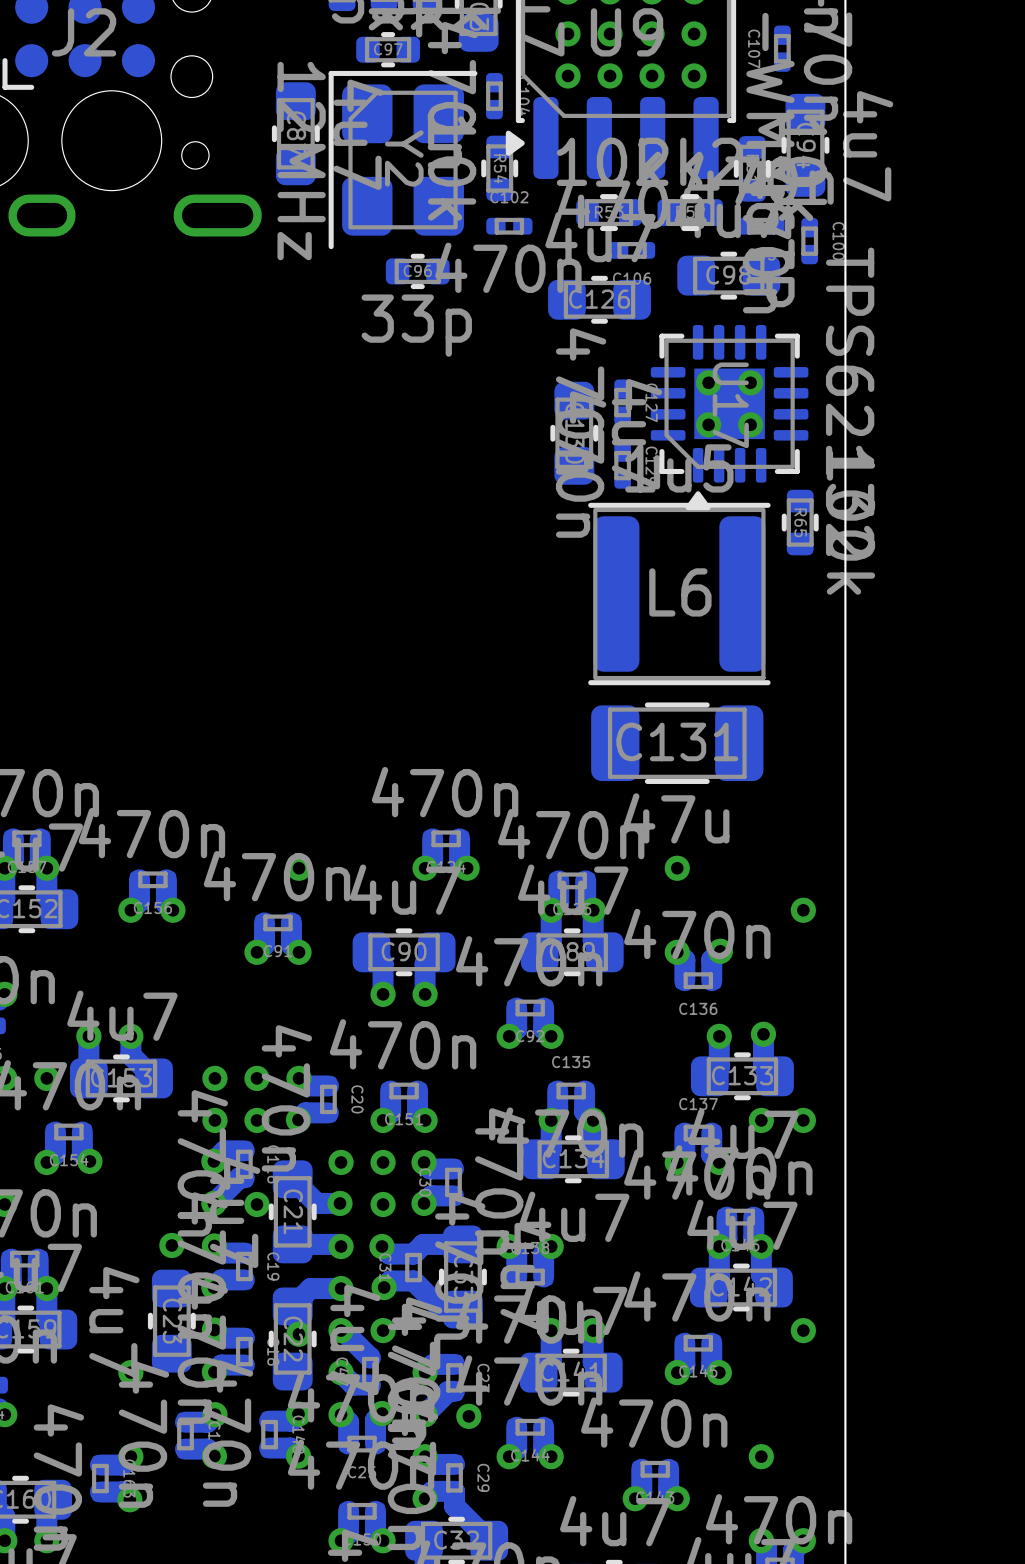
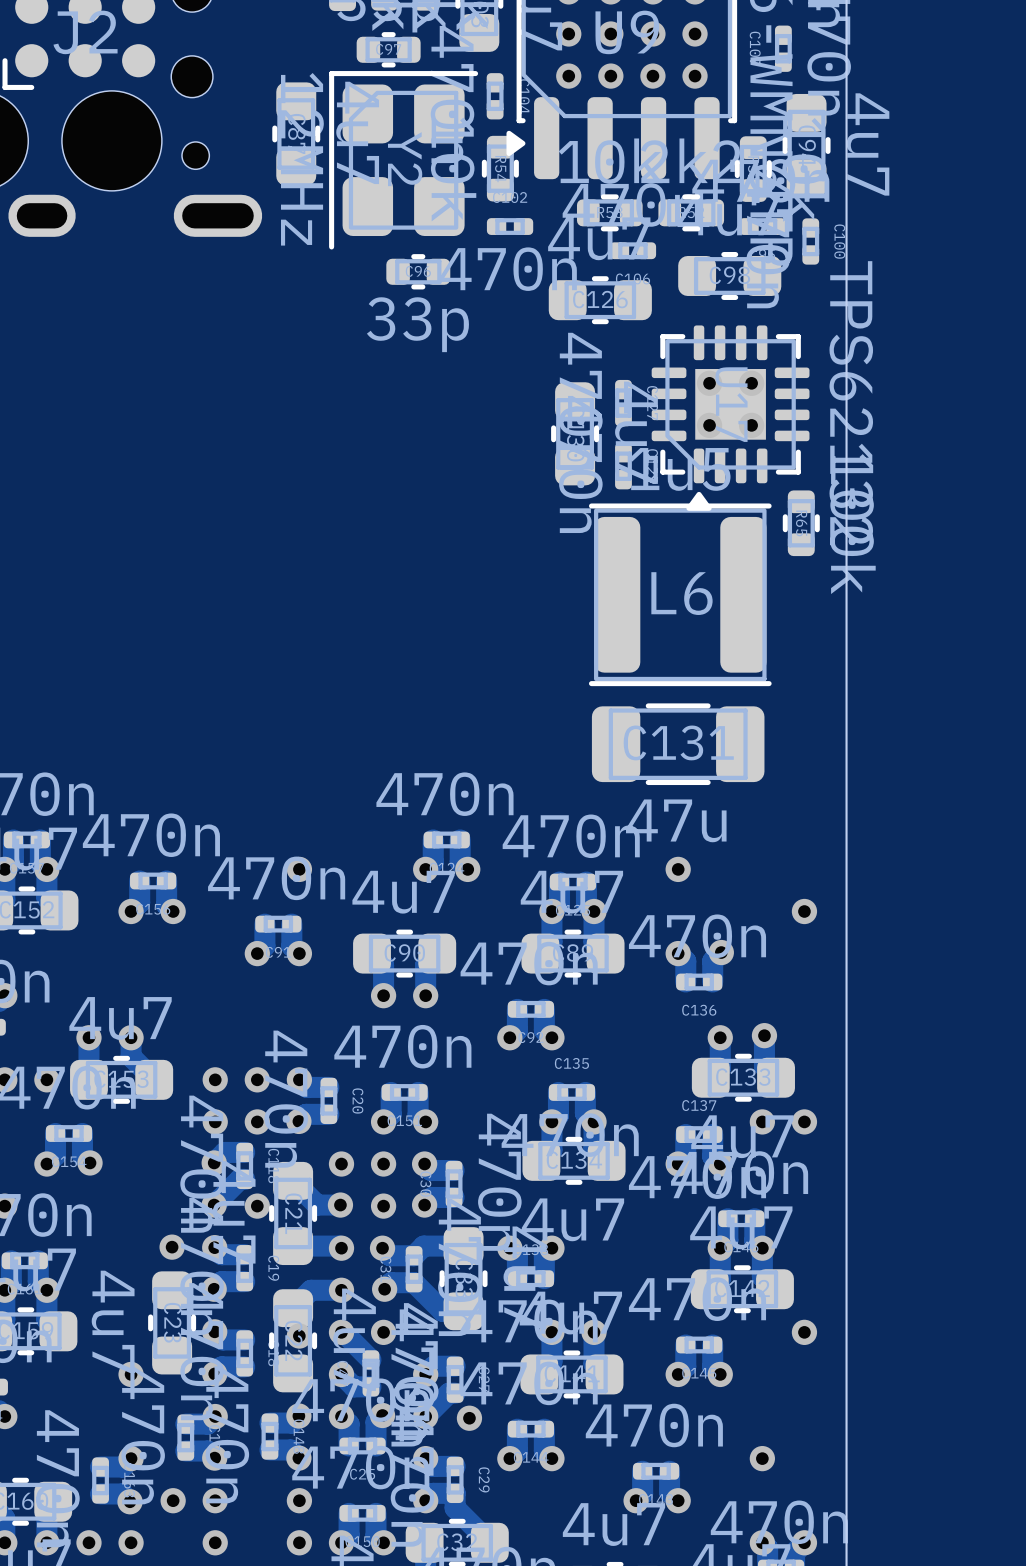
via: none -> (173, 1500)
via: none -> (215, 1500)
via: none -> (299, 1500)
via: none -> (88, 1542)
via: none -> (131, 1542)
via: none -> (215, 1542)
via: none -> (299, 1542)

